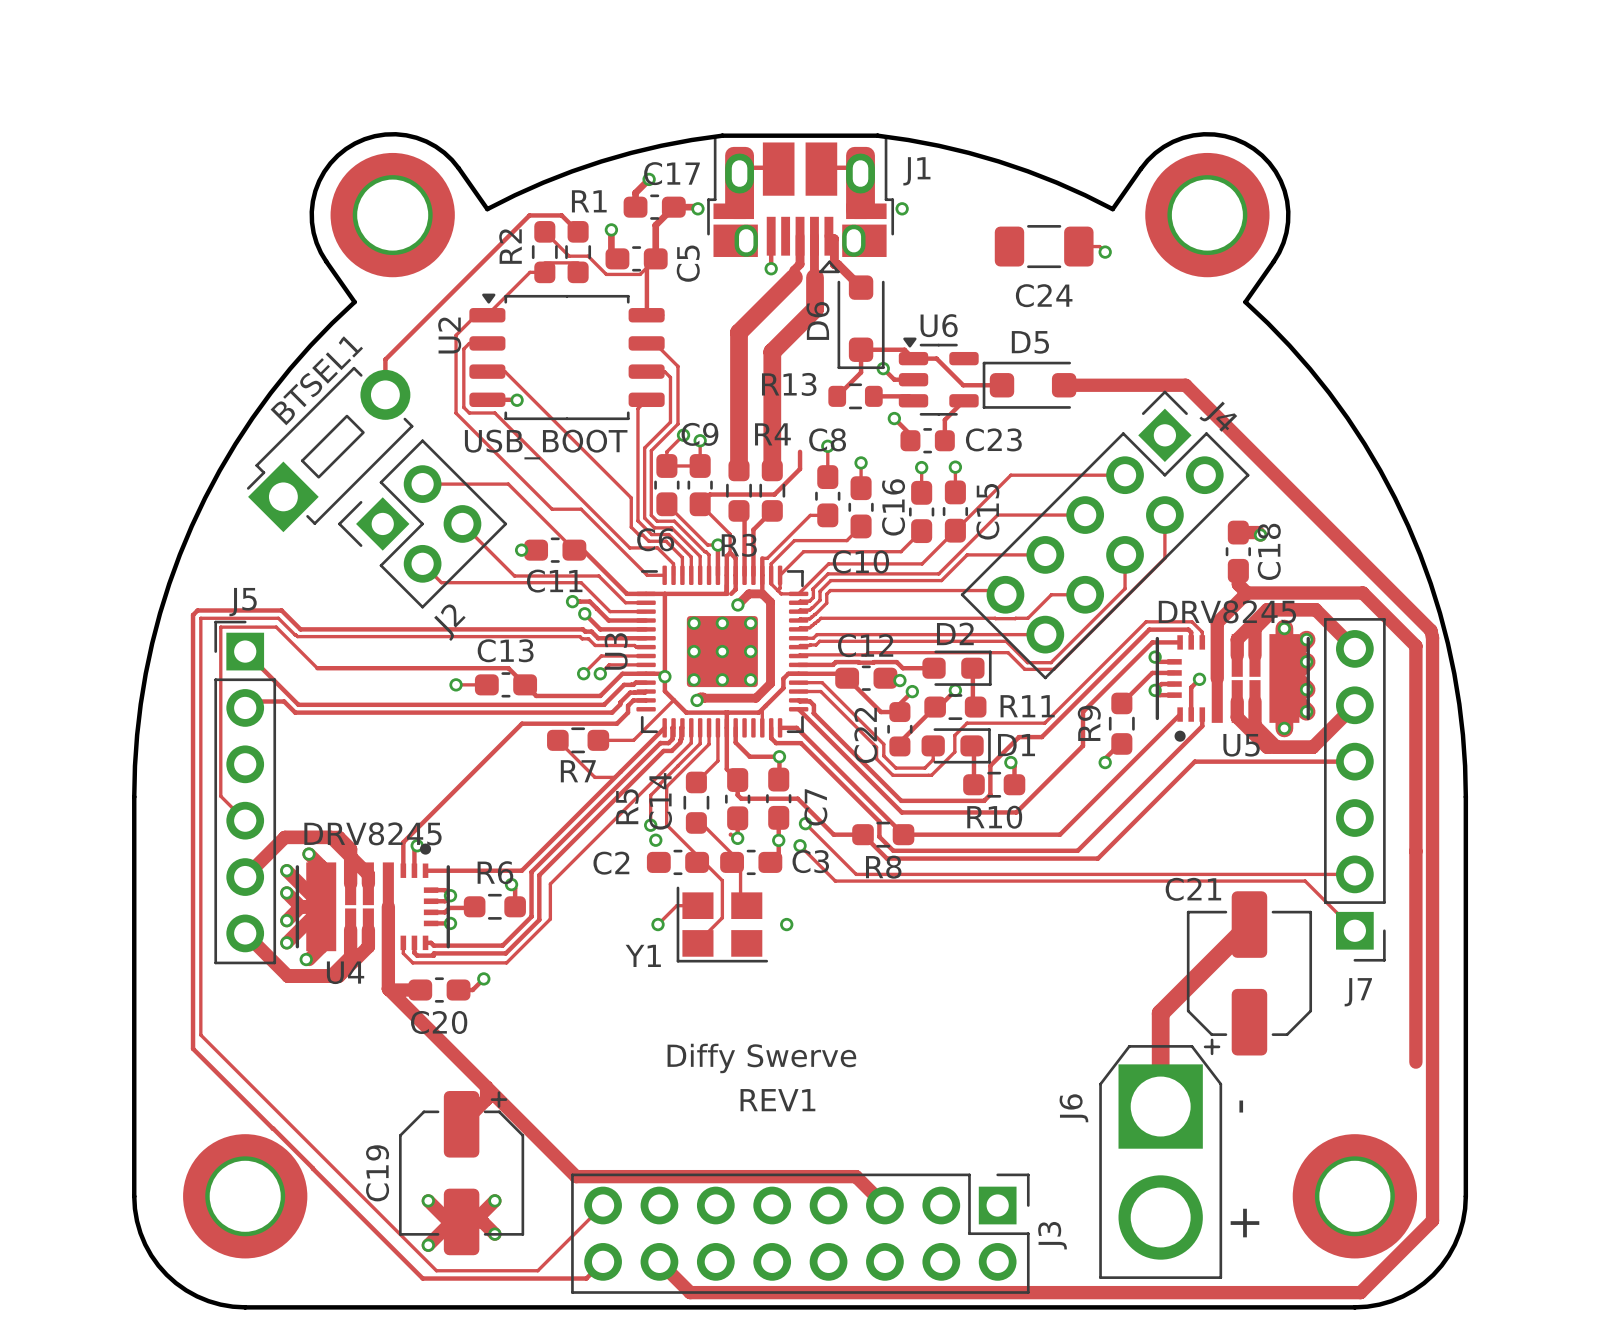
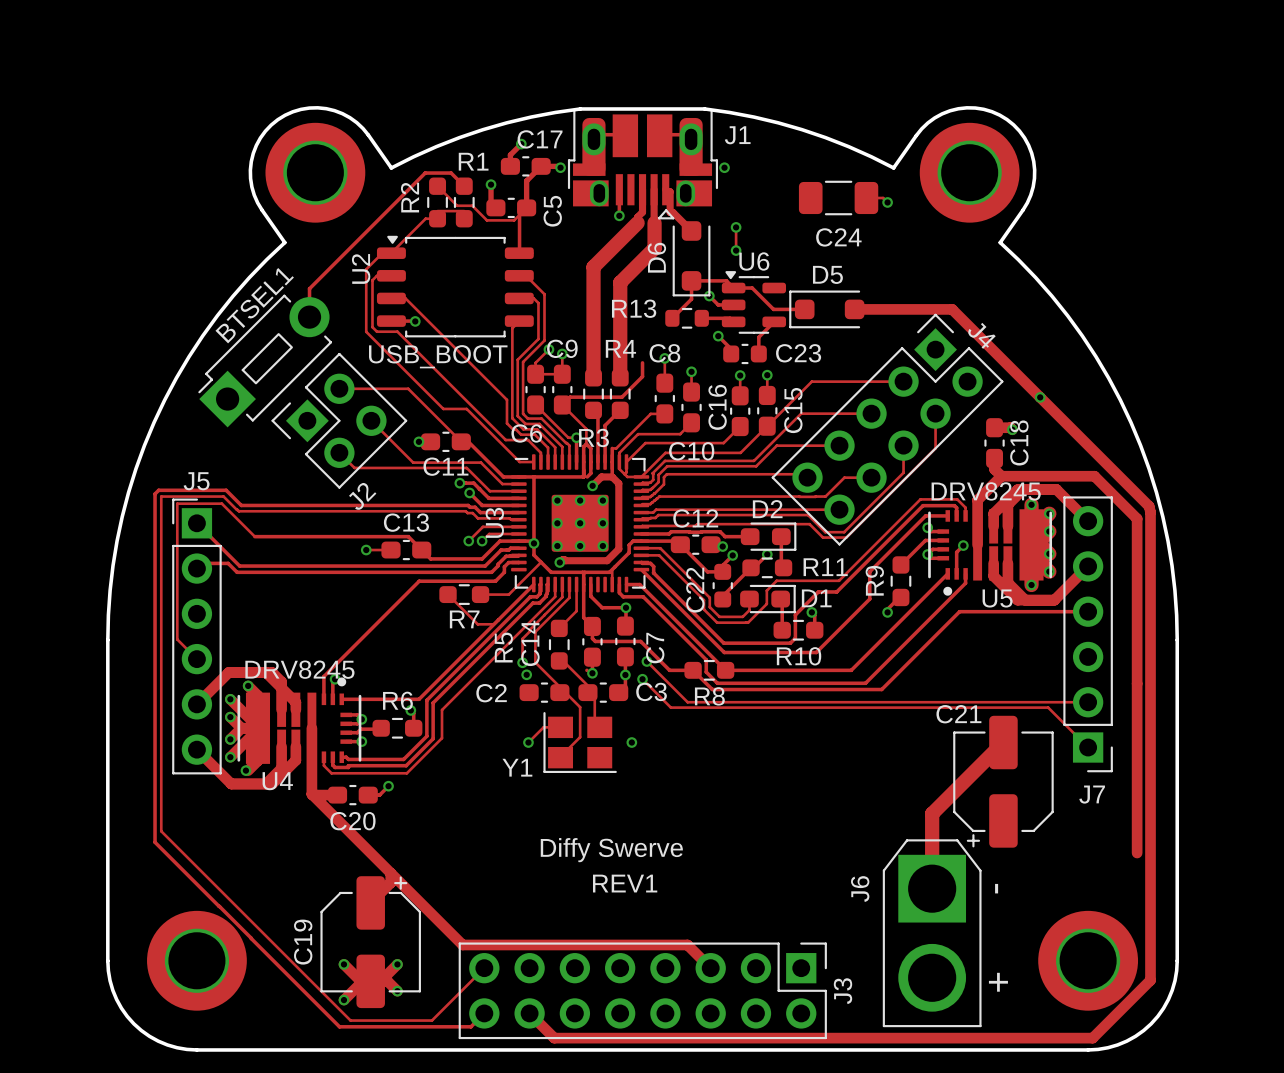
track: none -> (736, 227) (736, 250)
via: none -> (736, 227)
via: none -> (736, 250)
via: none -> (1040, 397)

